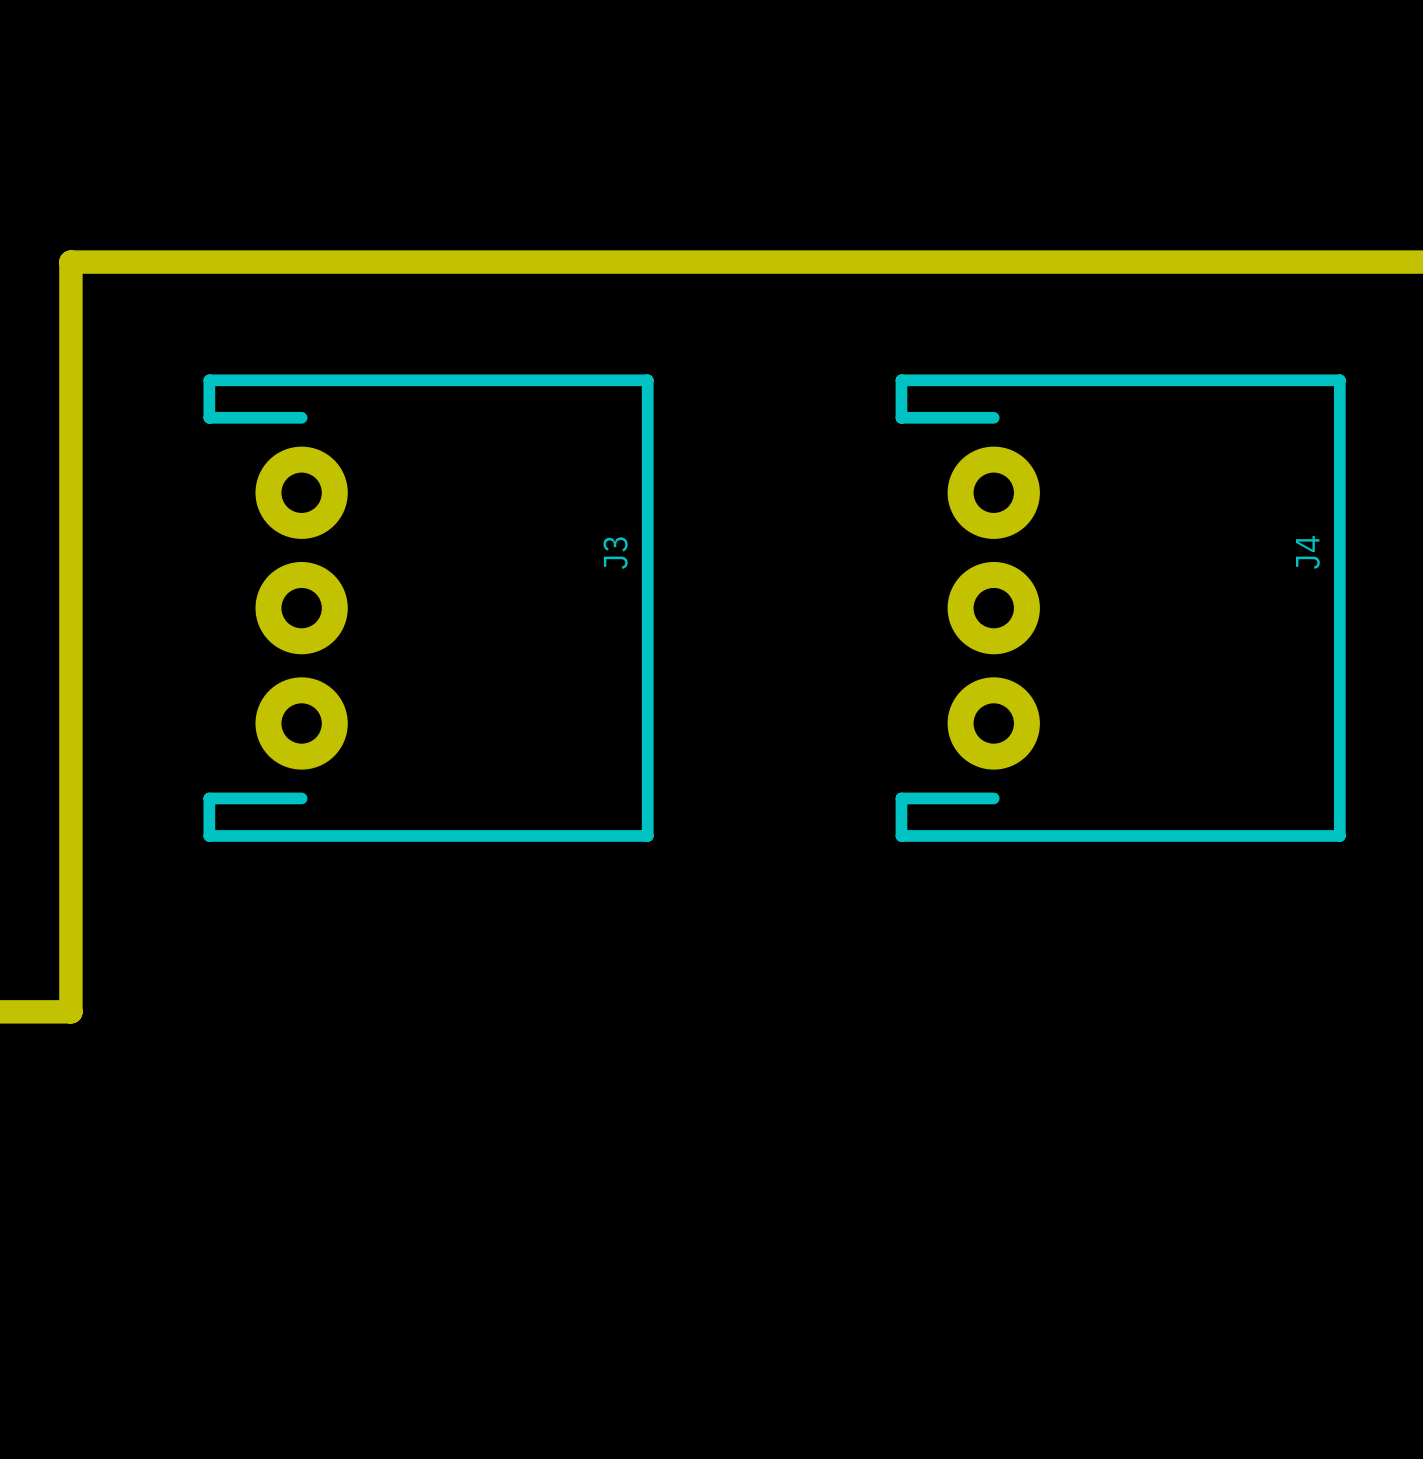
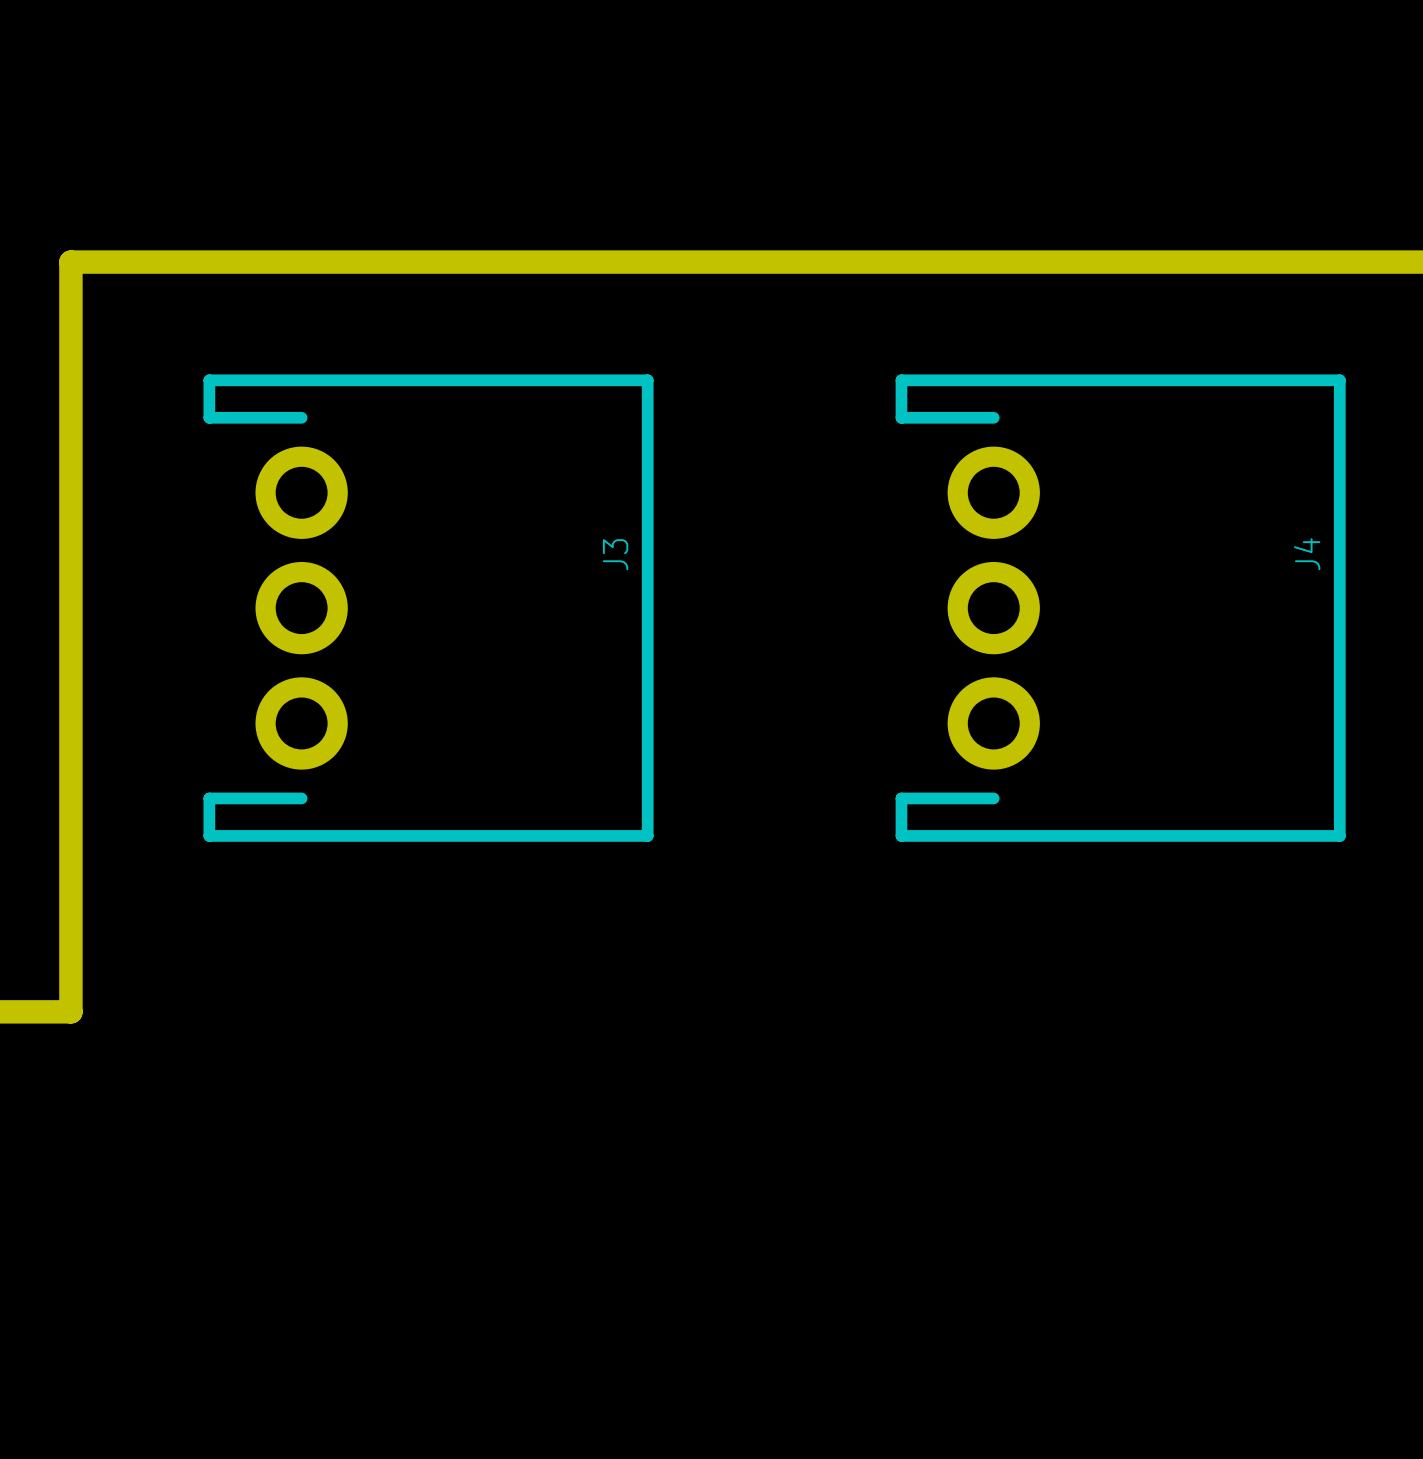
J3 footprint: [203, 374, 654, 842] -> [203, 374, 654, 842]
J4 footprint: [895, 374, 1346, 842] -> [895, 374, 1346, 842]

